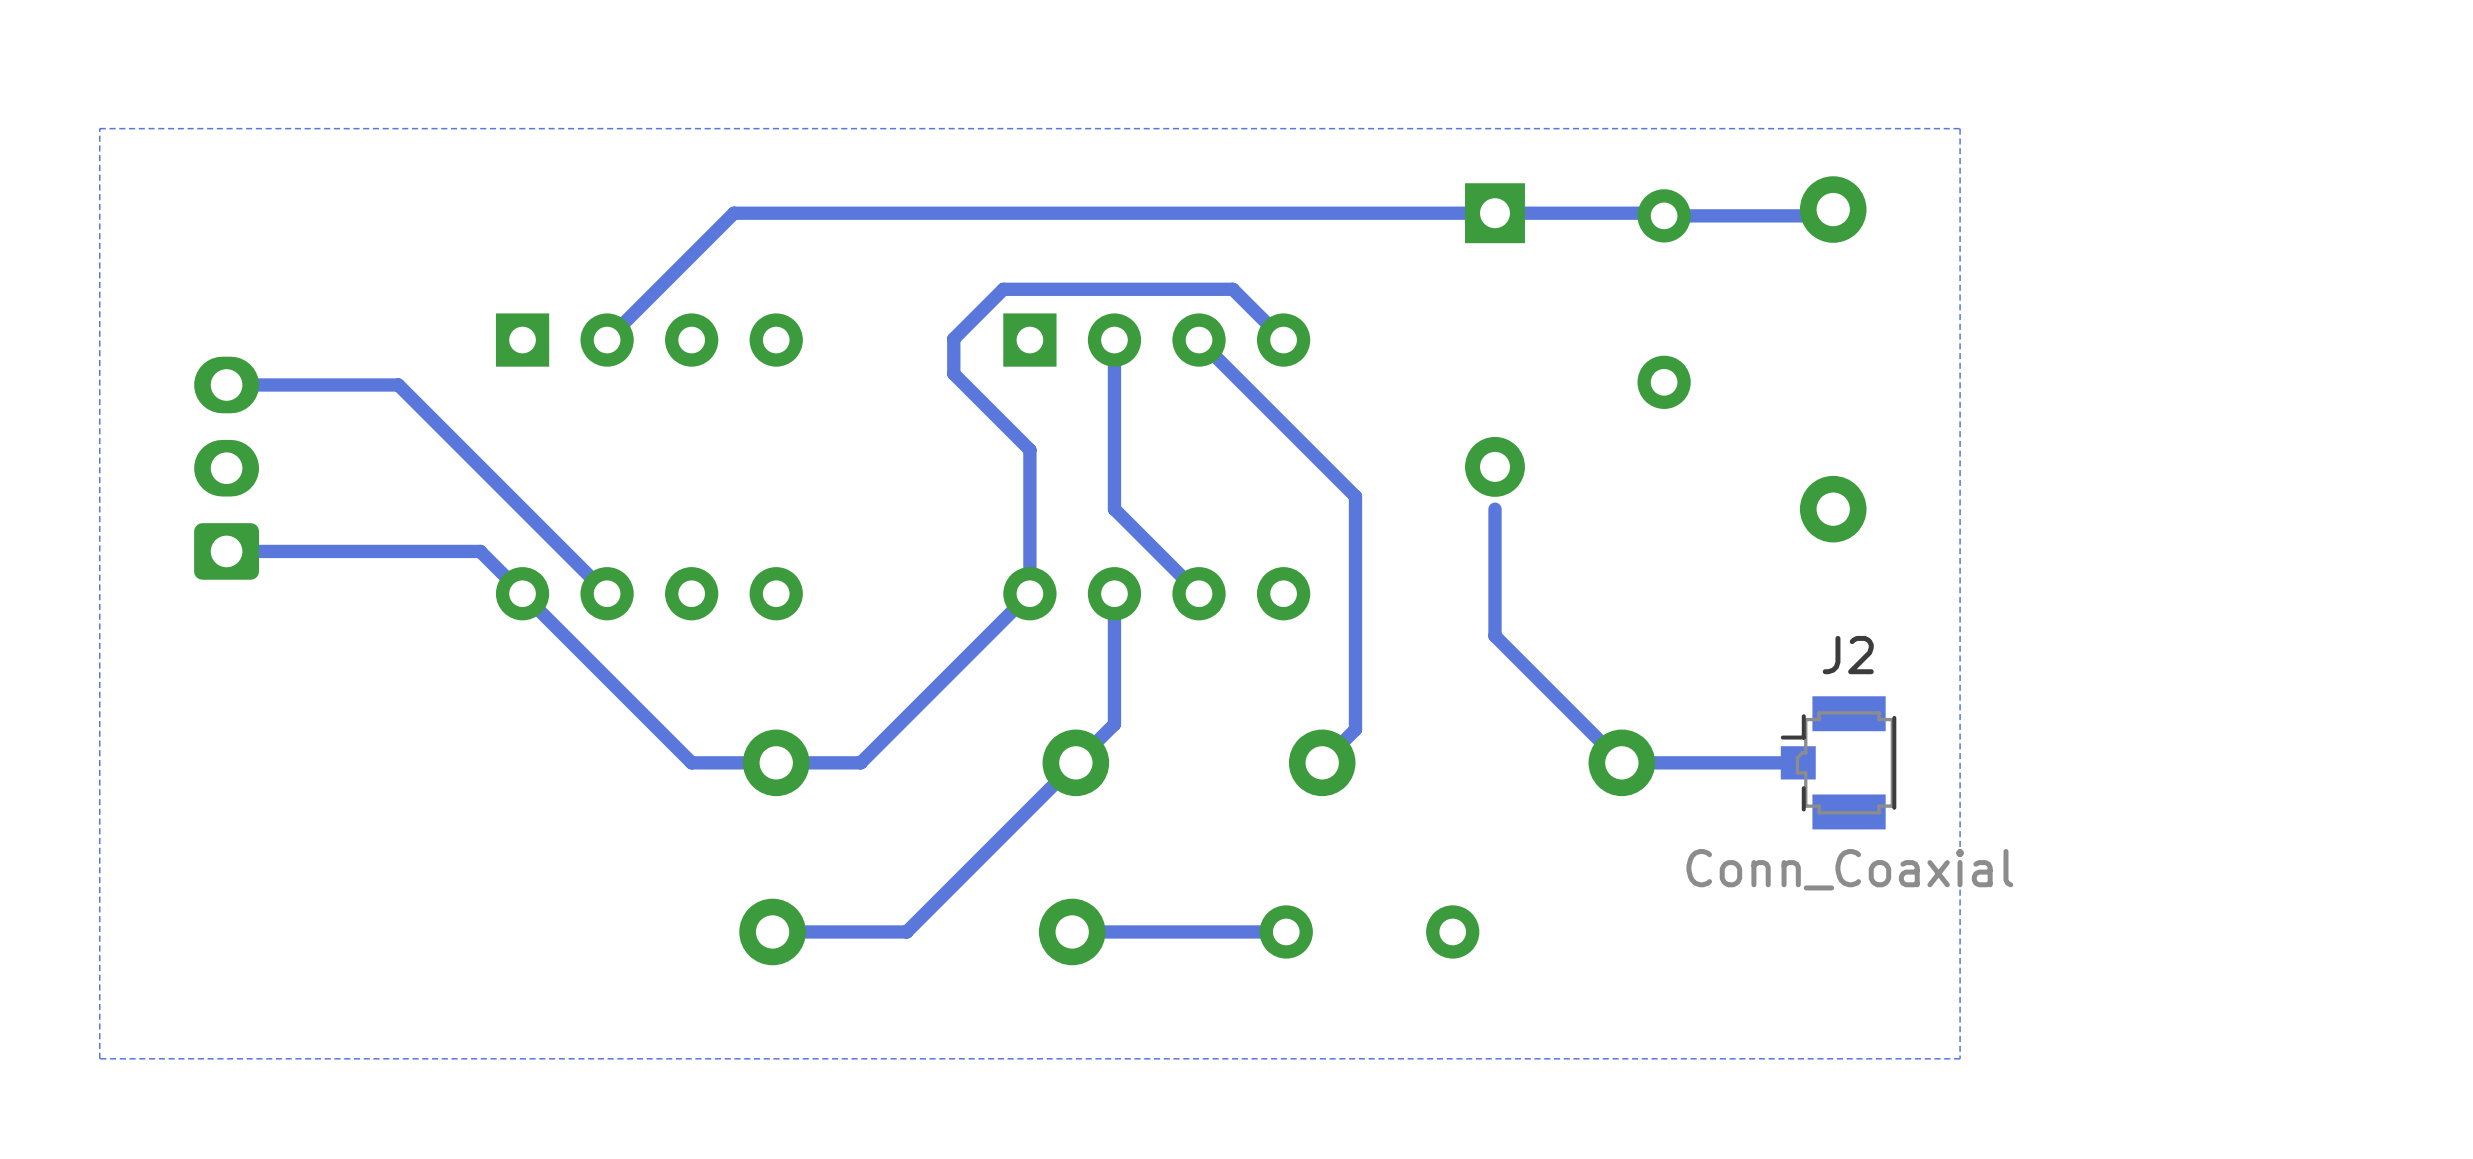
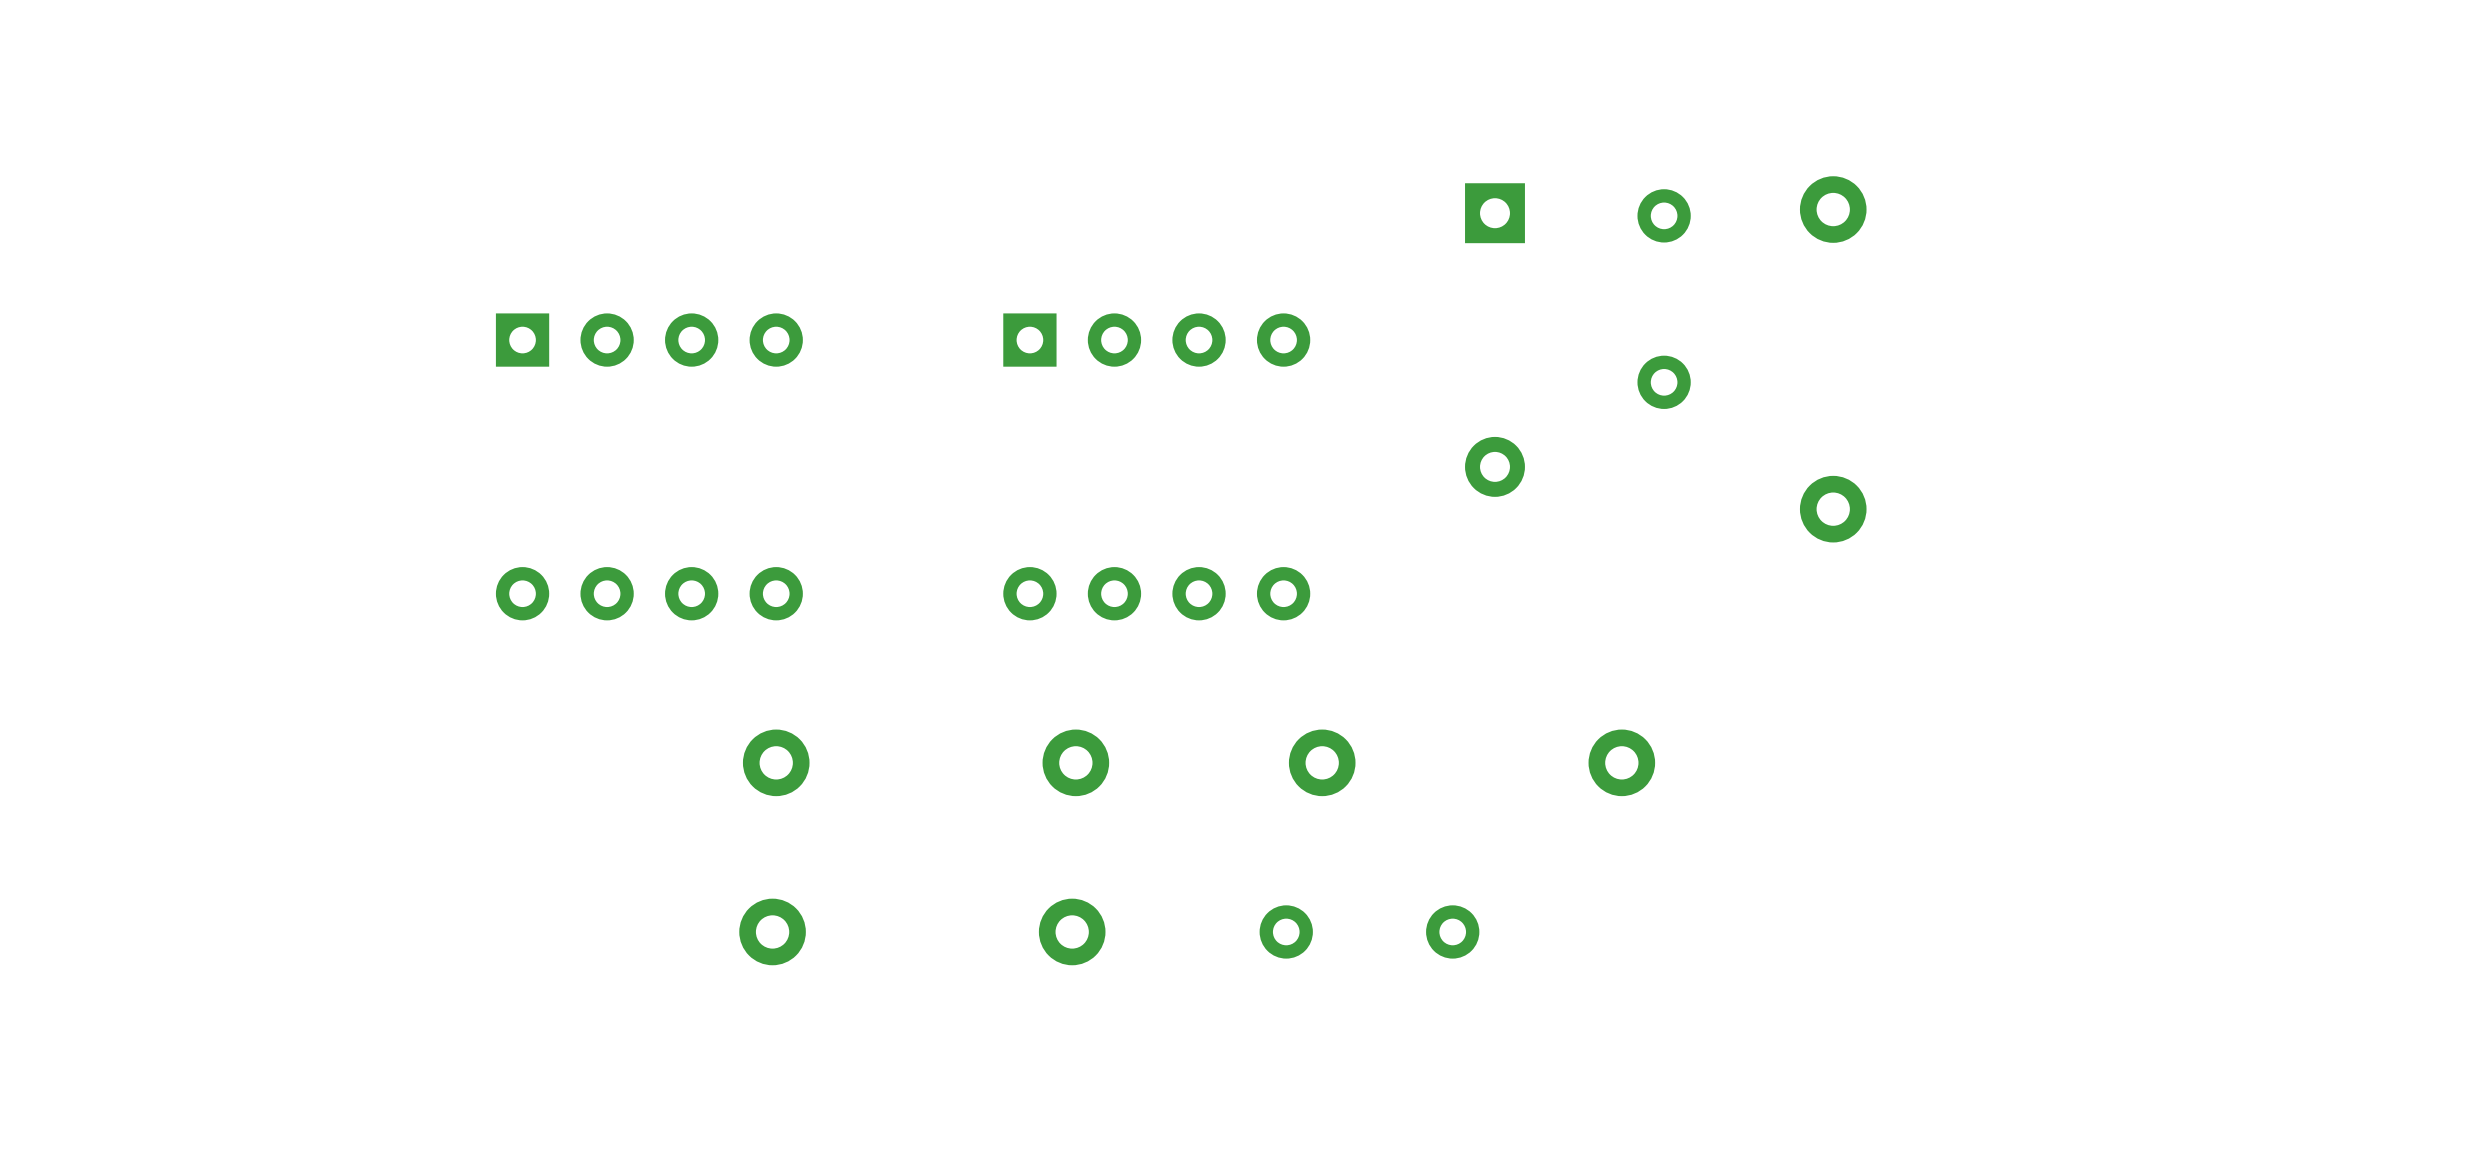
zone outline: (1960, 128) (99, 128) (99, 1058) (1960, 1058) (1960, 128) -> none
track: (1833, 209) (1826, 215) (1664, 215) (1661, 213) (733, 213) (607, 340) -> none
track: (1114, 340) (1114, 509) (1199, 593) -> none
track: (1199, 340) (1355, 496) (1355, 729) (1322, 762) -> none
track: (1283, 340) (1232, 289) (1003, 289) (953, 338) (953, 373) (1029, 449) (1029, 593) (860, 762) (691, 762) (480, 551) (226, 551) -> none
track: (226, 384) (398, 384) (607, 593) -> none
part: (226, 468) -> none
track: (1494, 509) (1494, 636) (1621, 762) (1798, 762) -> none
track: (1114, 593) (1114, 724) (906, 931) (772, 931) -> none
J2: Conn_Coaxial (1838, 762) -> none
track: (1286, 931) (1072, 931) -> none

